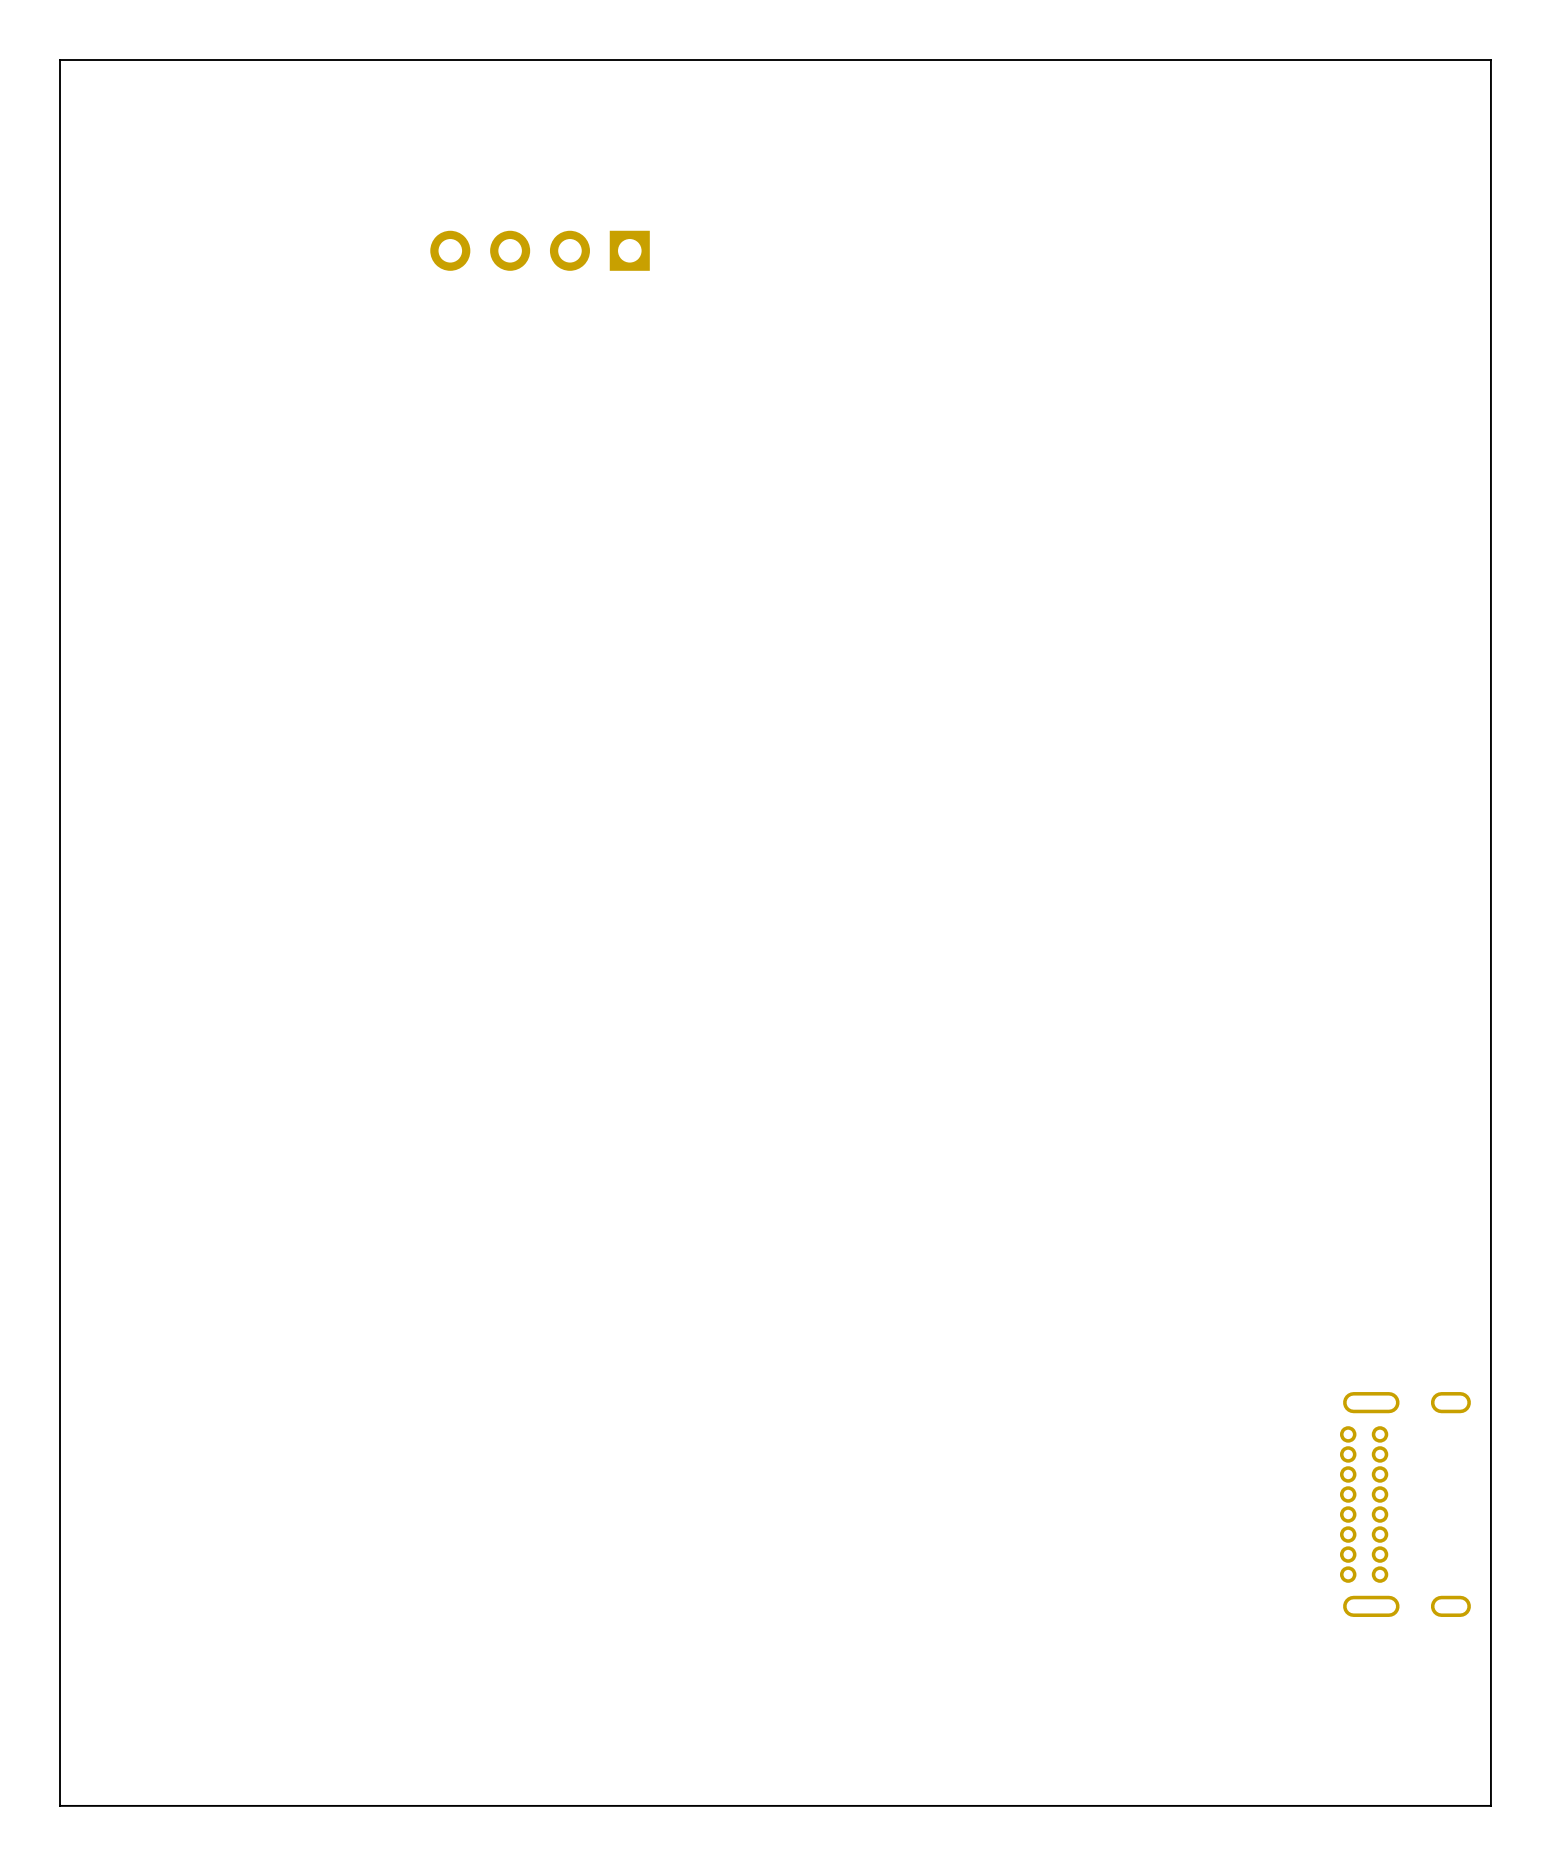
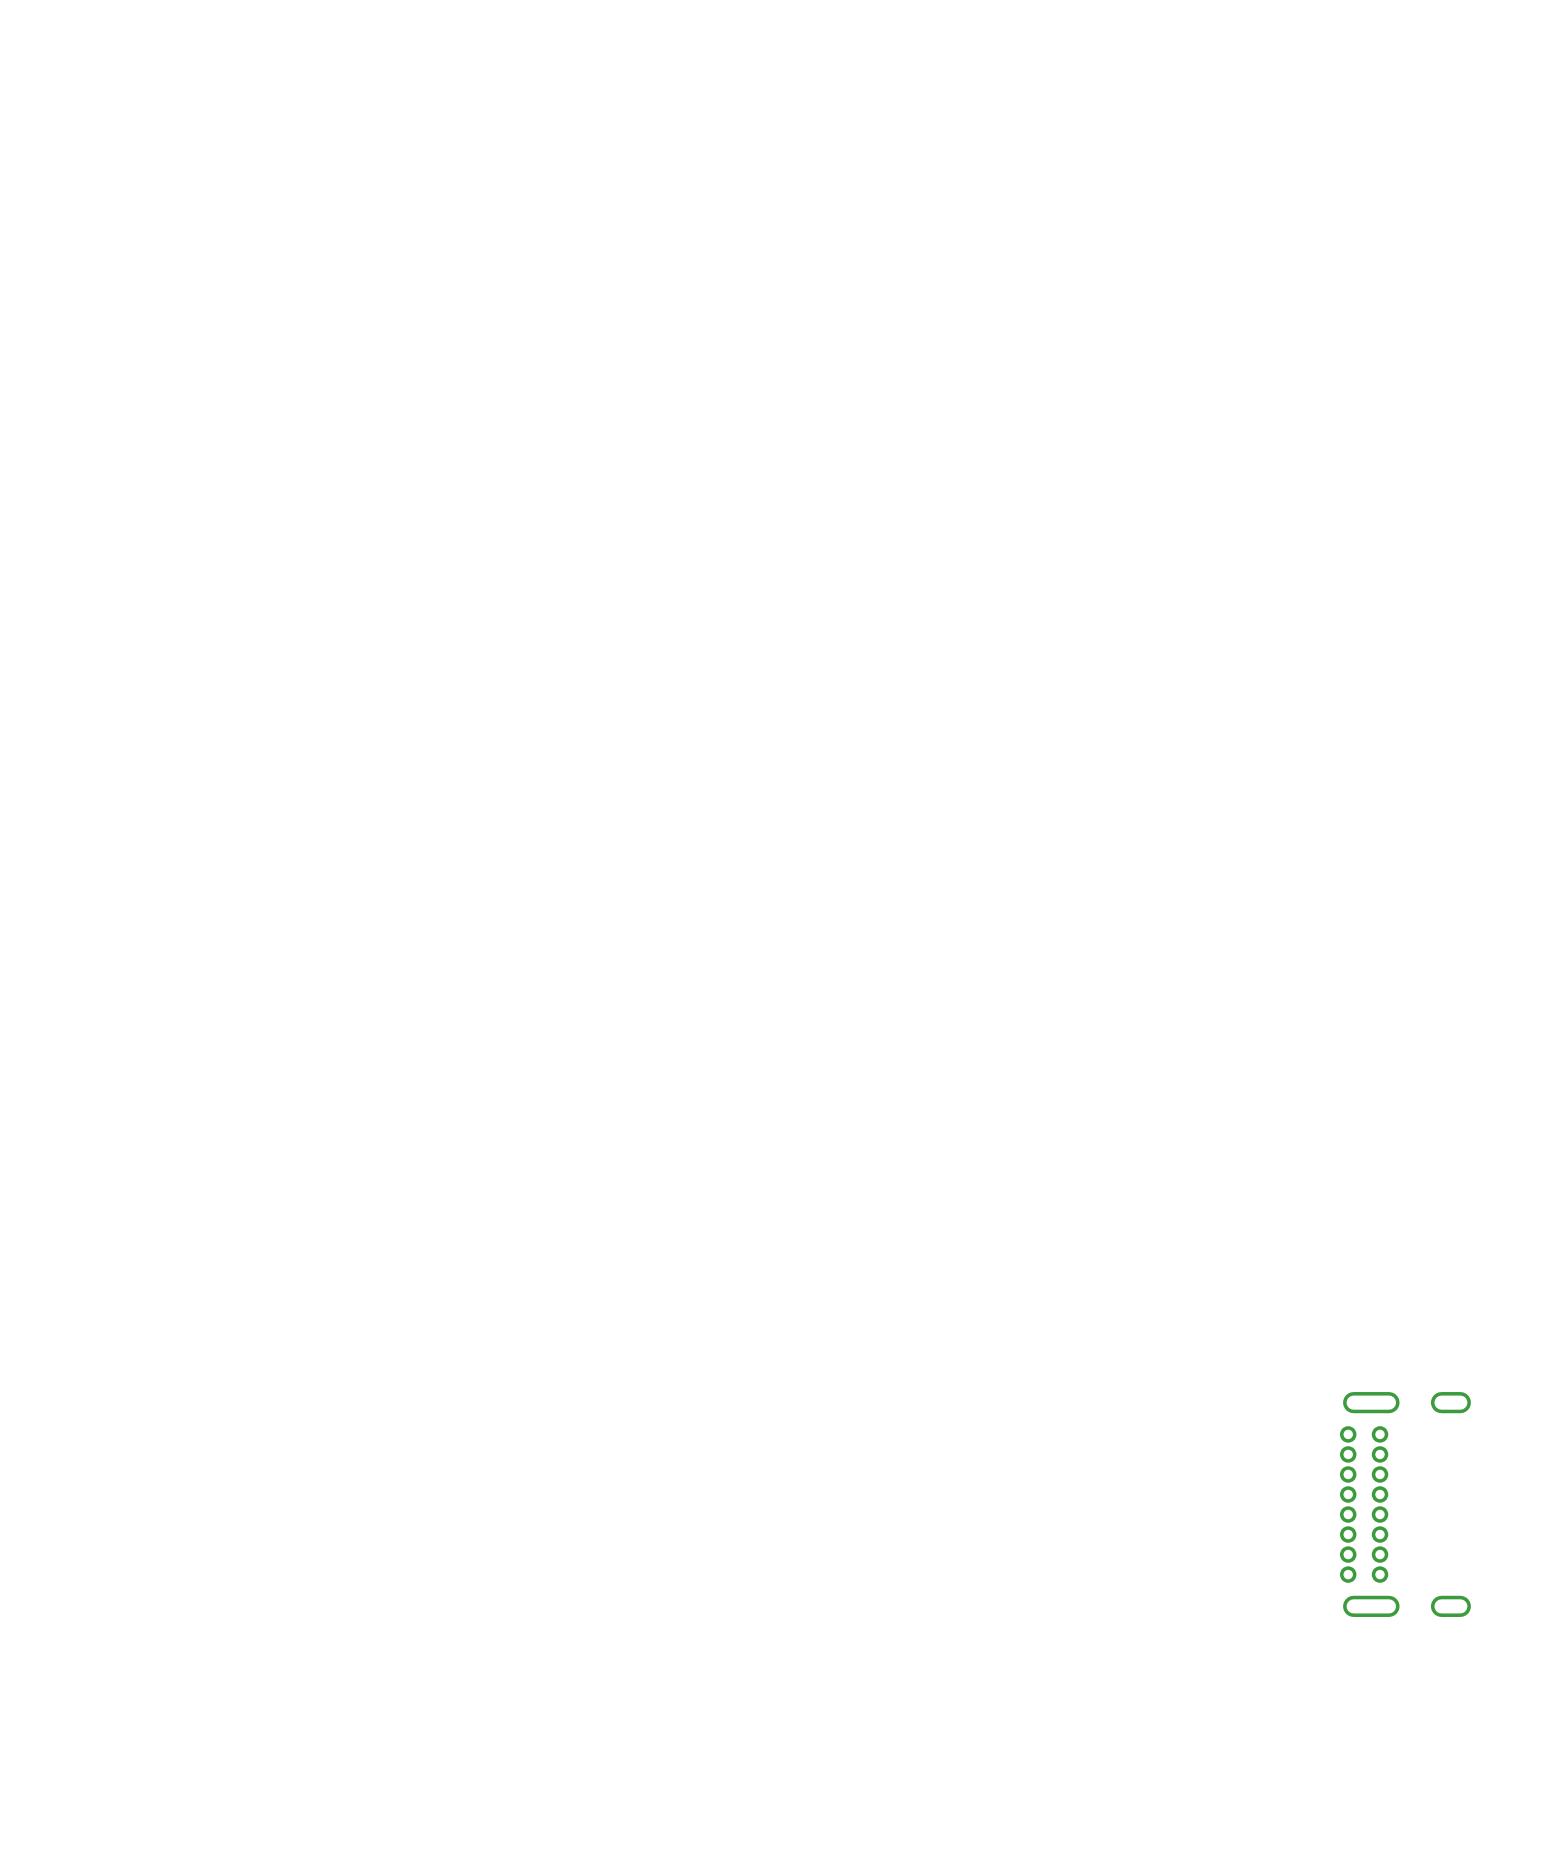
board edge: (1490, 60) (60, 60) (60, 1805) (1490, 1805) (1490, 60) -> none
part: (540, 250) -> none

